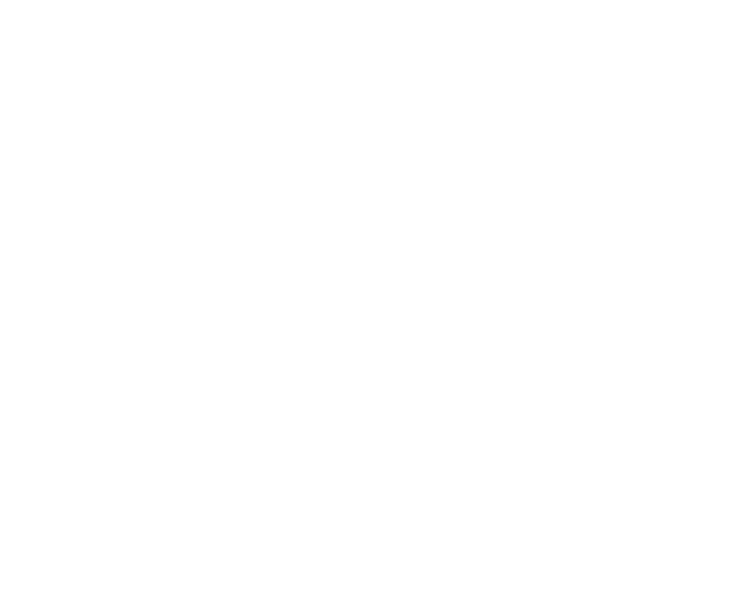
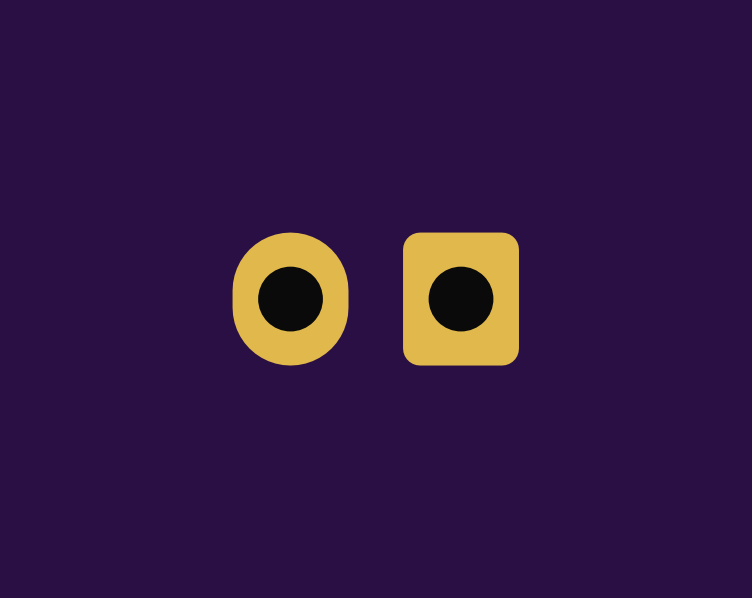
part: none -> (375, 299)

